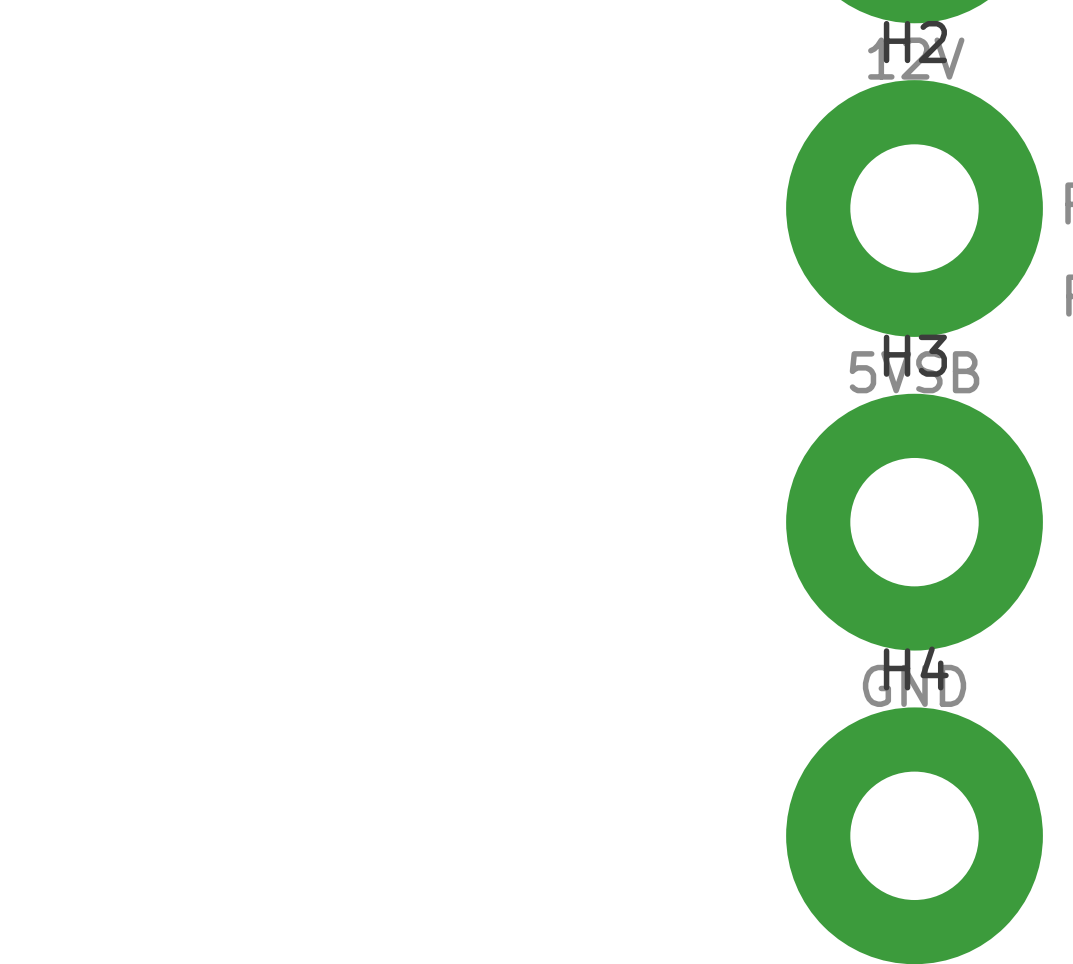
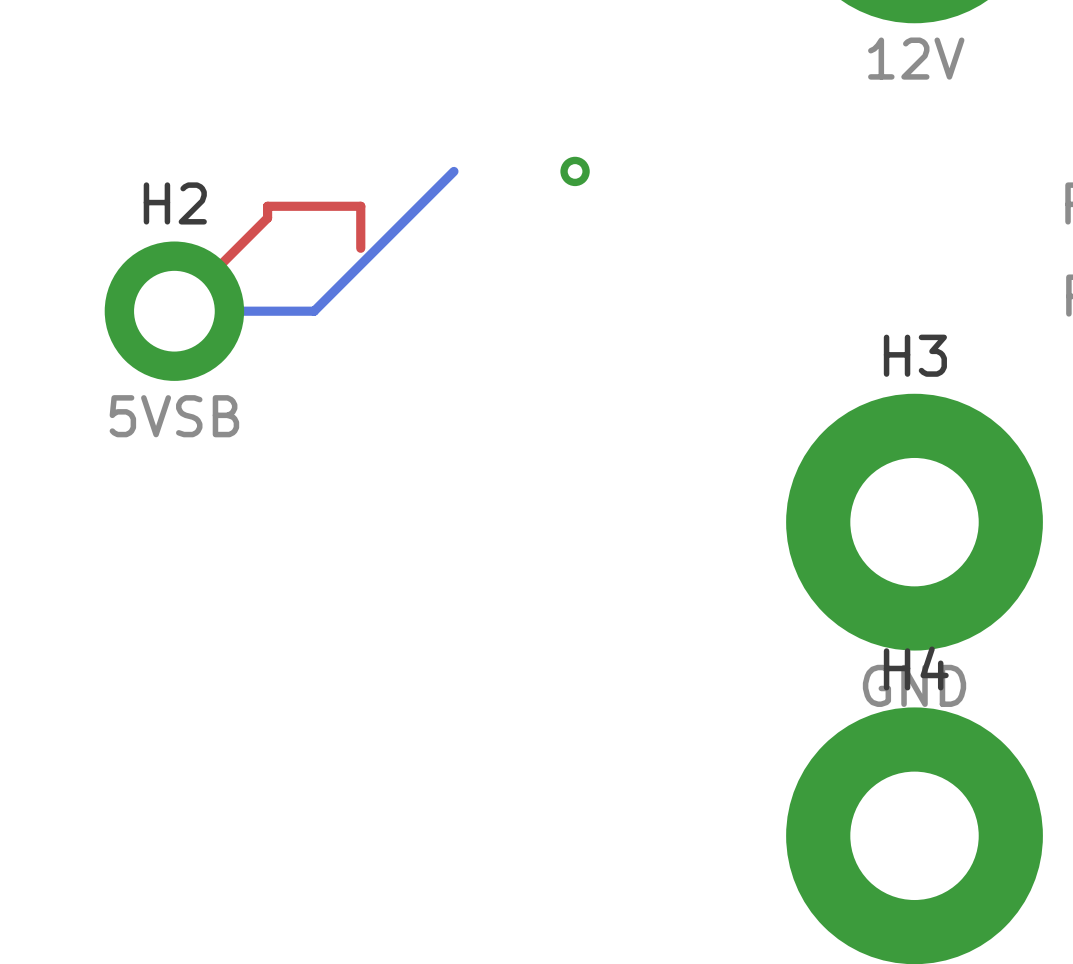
H2 footprint: [786, 80, 1043, 337] -> [104, 241, 245, 381]
bottom track: none -> (453, 171) (314, 311) (174, 311)
via: none -> (575, 171)
top track: none -> (360, 248) (360, 206) (267, 206) (267, 218) (174, 311)

